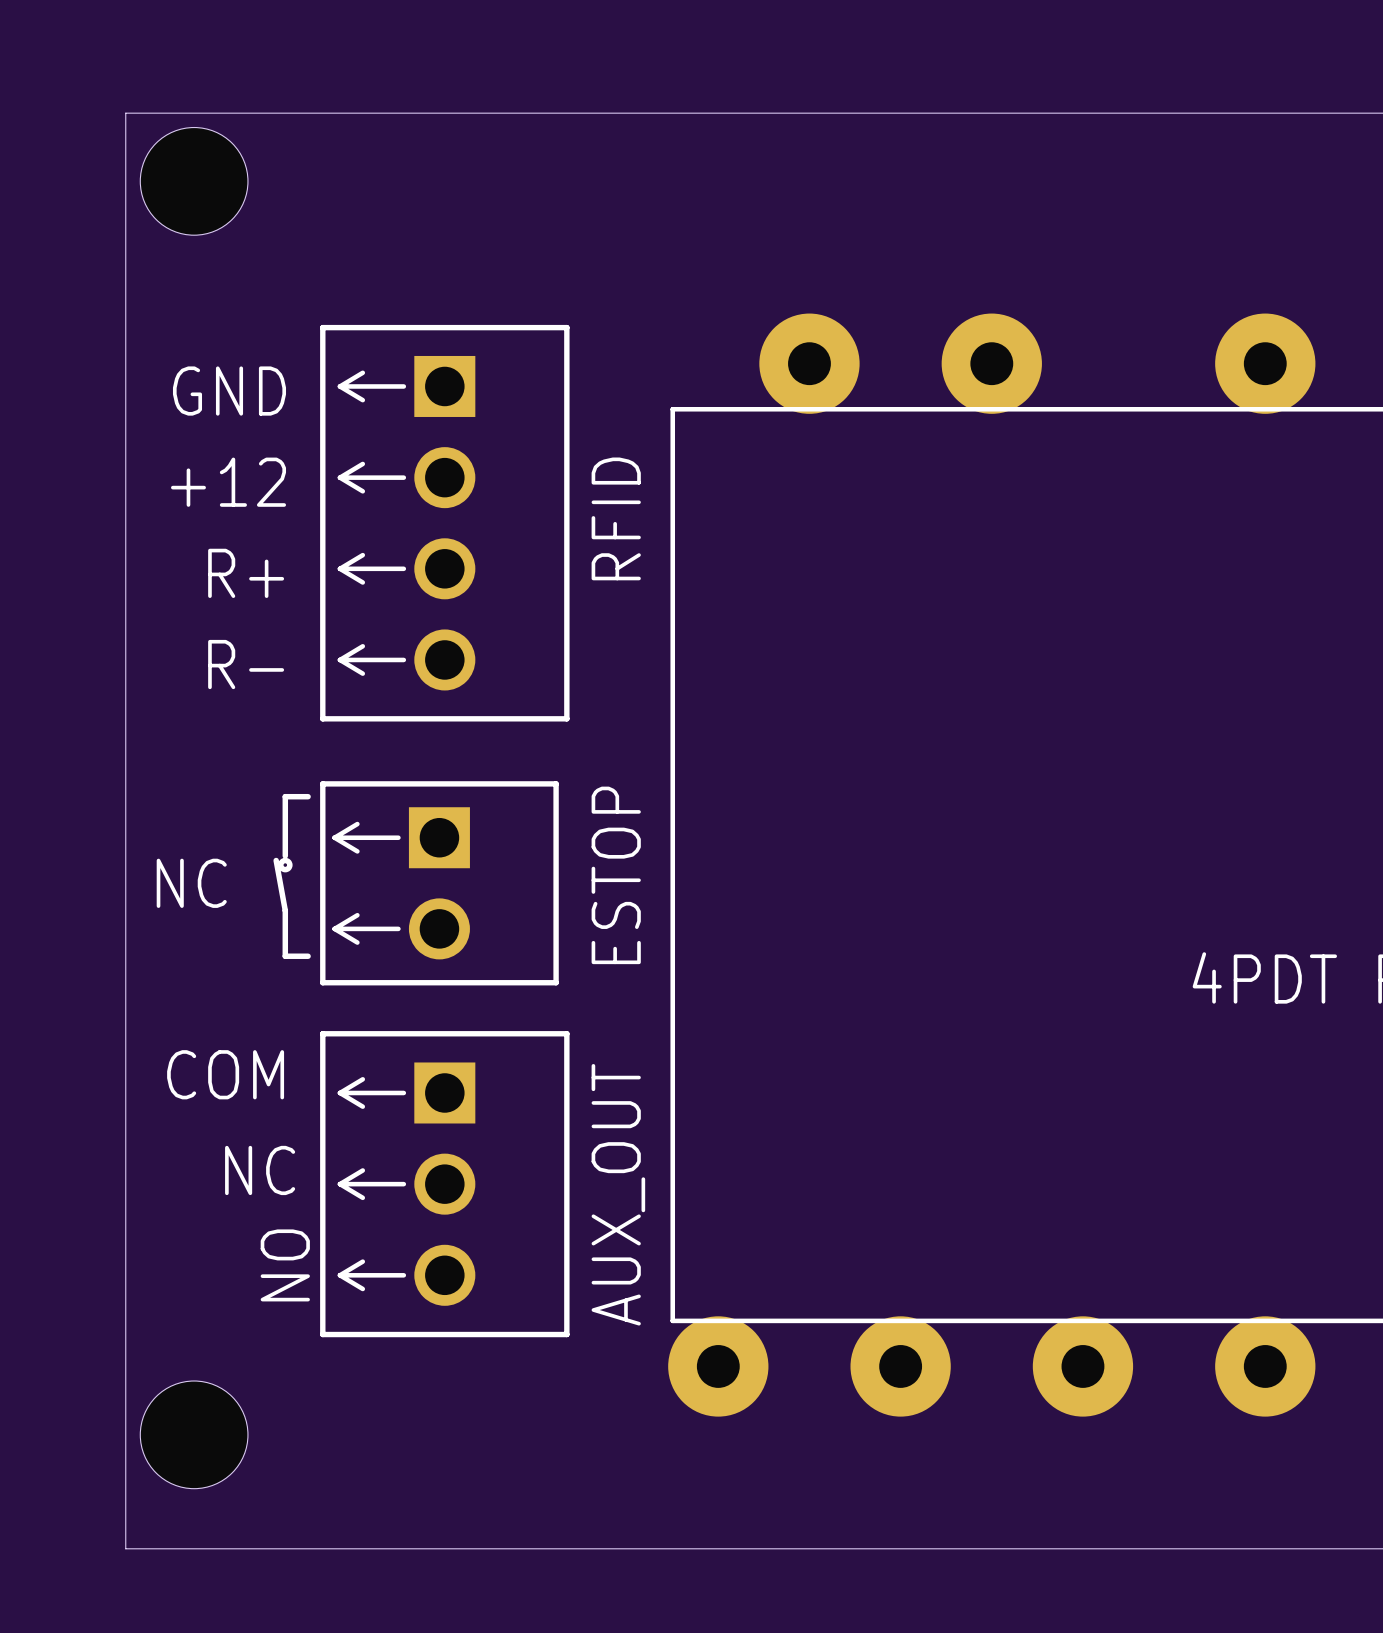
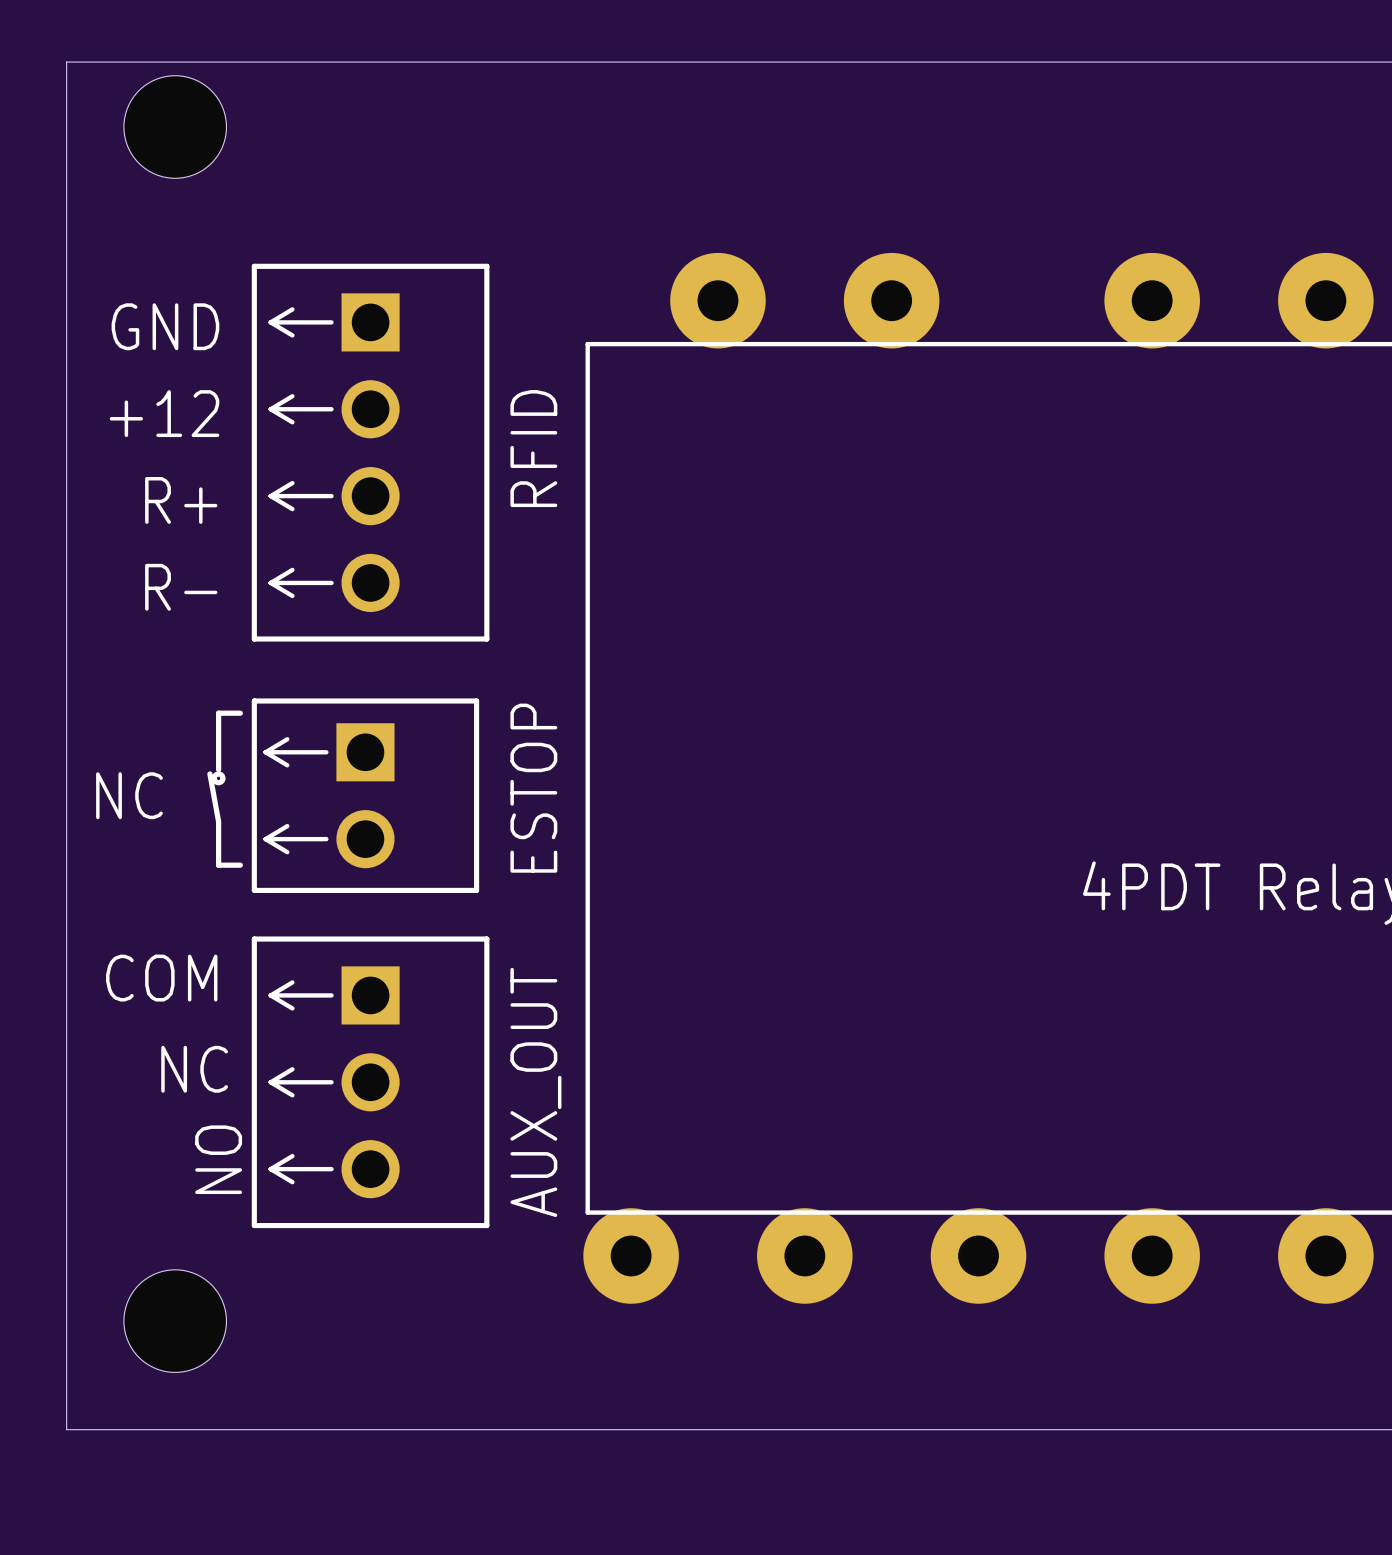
hole position: (194, 181) -> (175, 127)
hole position: (194, 1434) -> (175, 1321)

